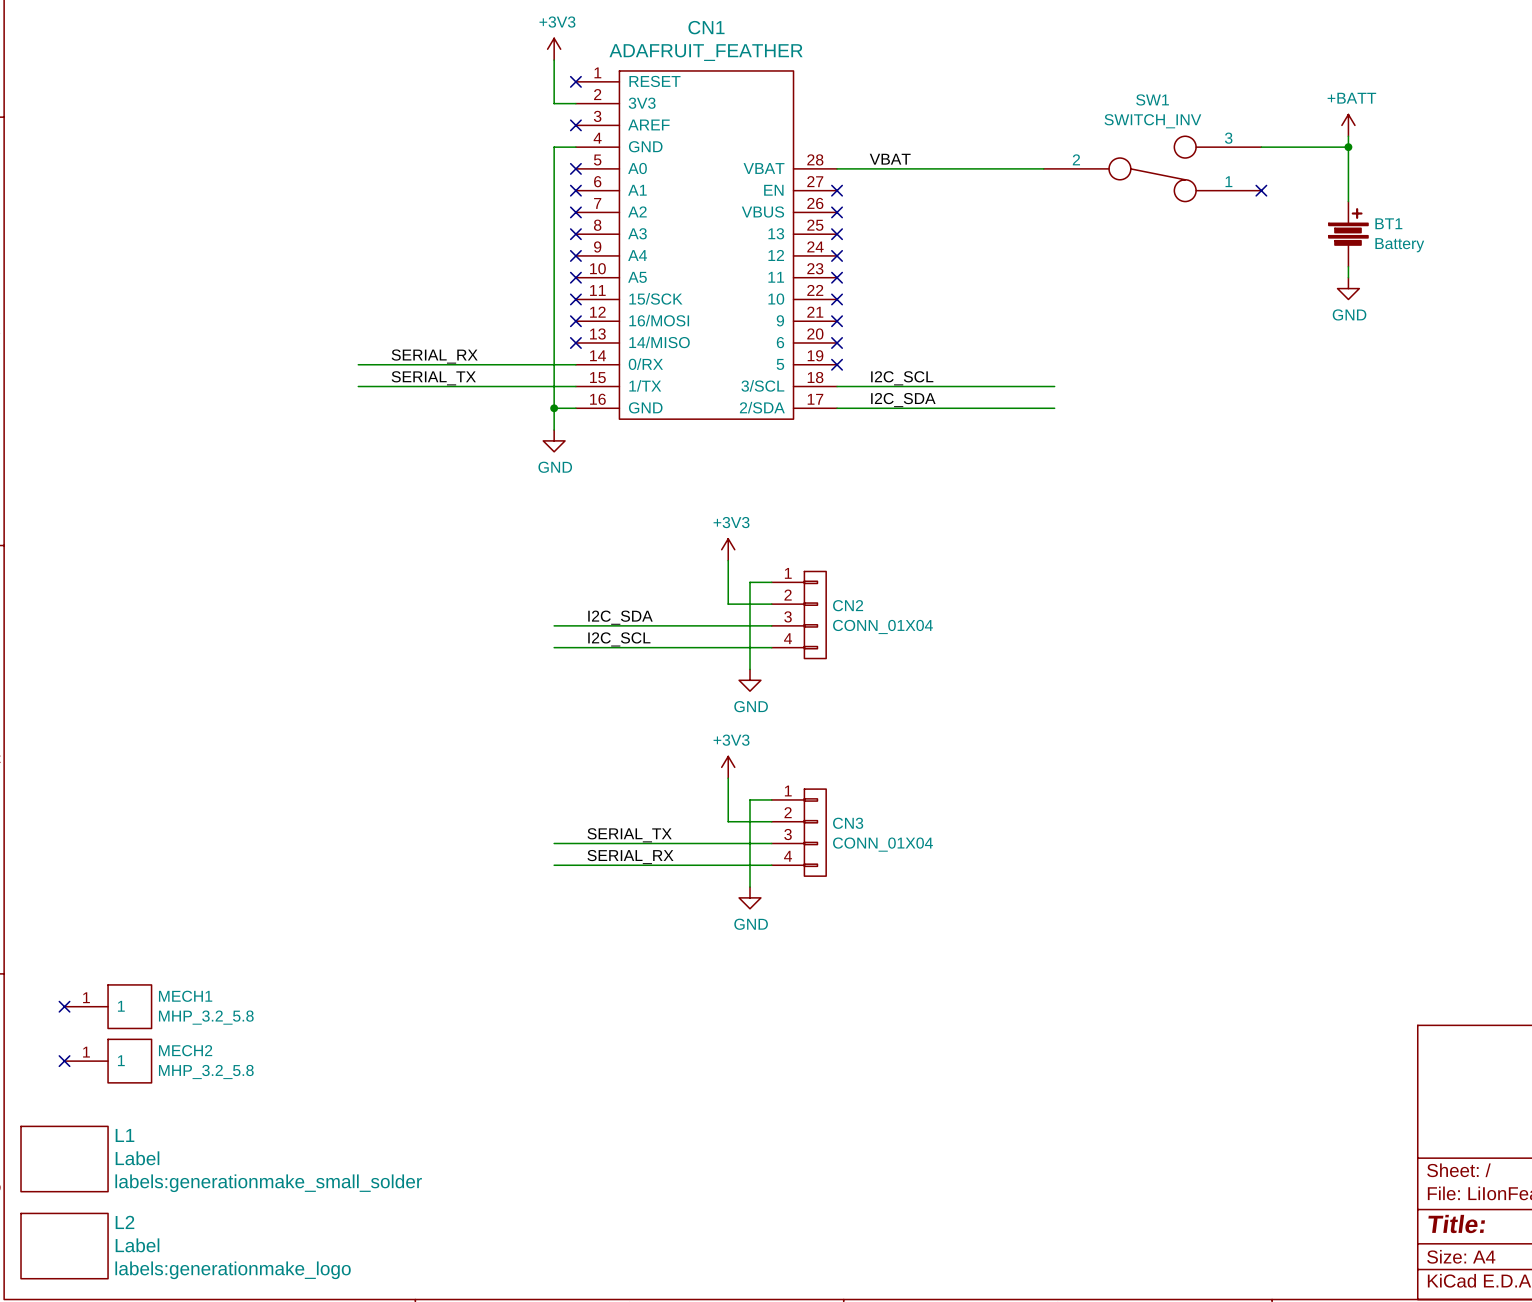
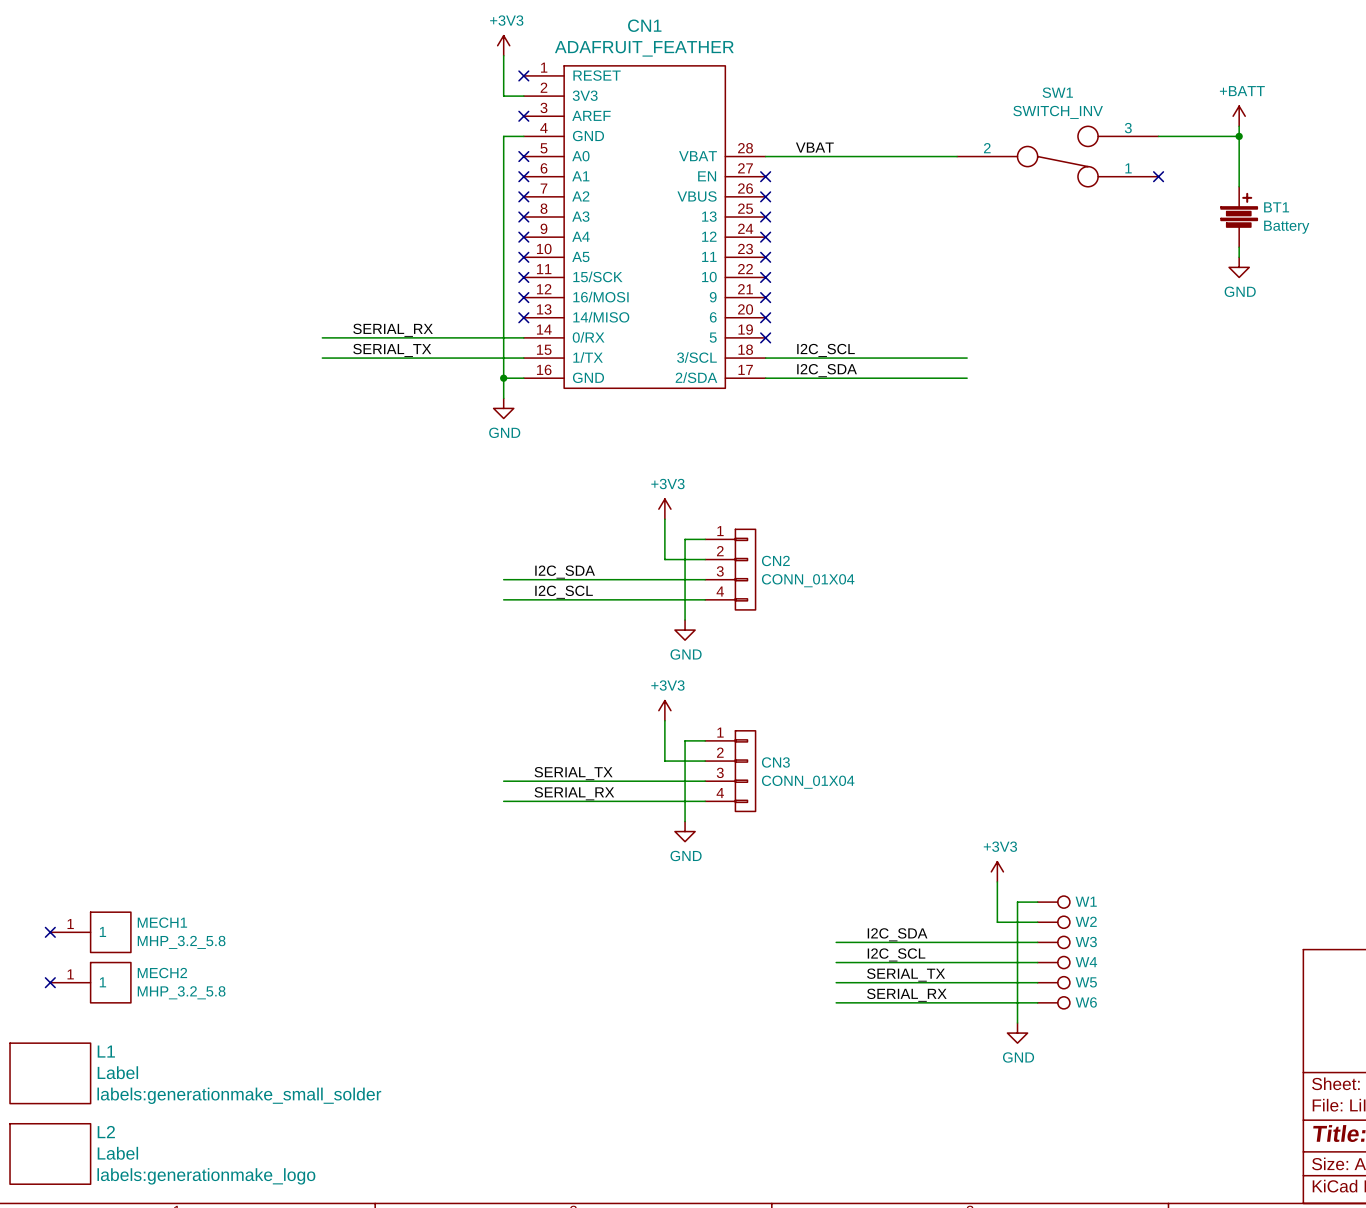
power symbol: none -> +3V3 (997, 871)
wire: none -> (997, 881) (997, 922) (1037, 922)
wire: none -> (1037, 902) (1017, 902) (1017, 1023)
W1: none -> (1053, 902)
W2: none -> (1053, 922)
label: none -> I2C_SDA (897, 934)
wire: none -> (836, 942) (1037, 942)
W3: none -> (1053, 942)
label: none -> I2C_SCL (896, 954)
wire: none -> (836, 962) (1037, 962)
W4: none -> (1053, 962)
label: none -> SERIAL_TX (906, 975)
wire: none -> (836, 982) (1037, 982)
W5: none -> (1053, 982)
label: none -> SERIAL_RX (906, 995)
wire: none -> (836, 1002) (1037, 1002)
W6: none -> (1053, 1002)
power symbol: none -> GND (1017, 1033)

